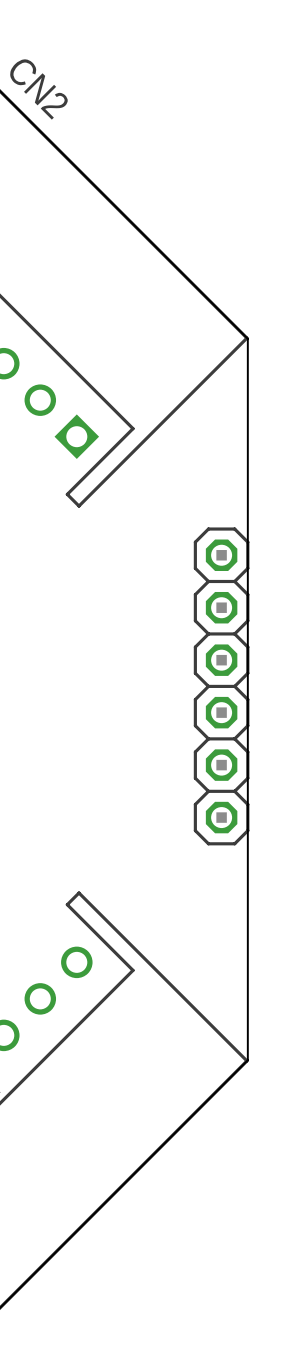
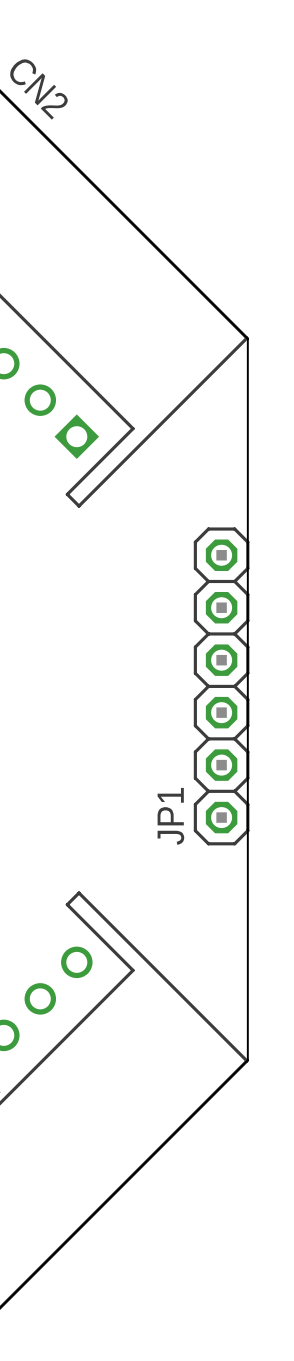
JP1 name: none -> JP1 (170, 816)

